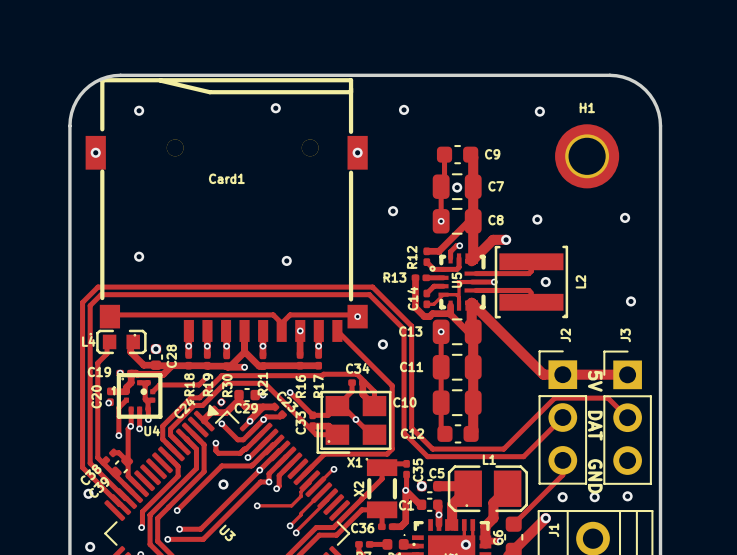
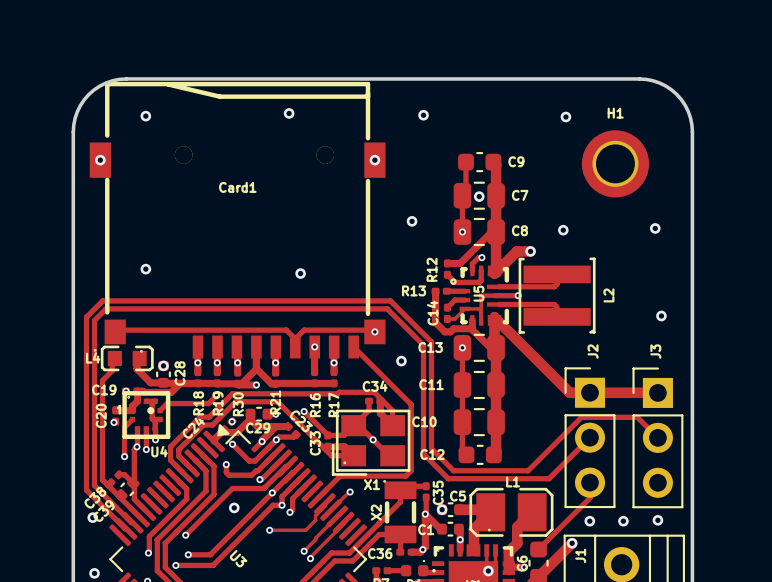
via: (545, 282) -> none
text: 5V DAT GND (595, 432) -> none
via: none -> (422, 549)

